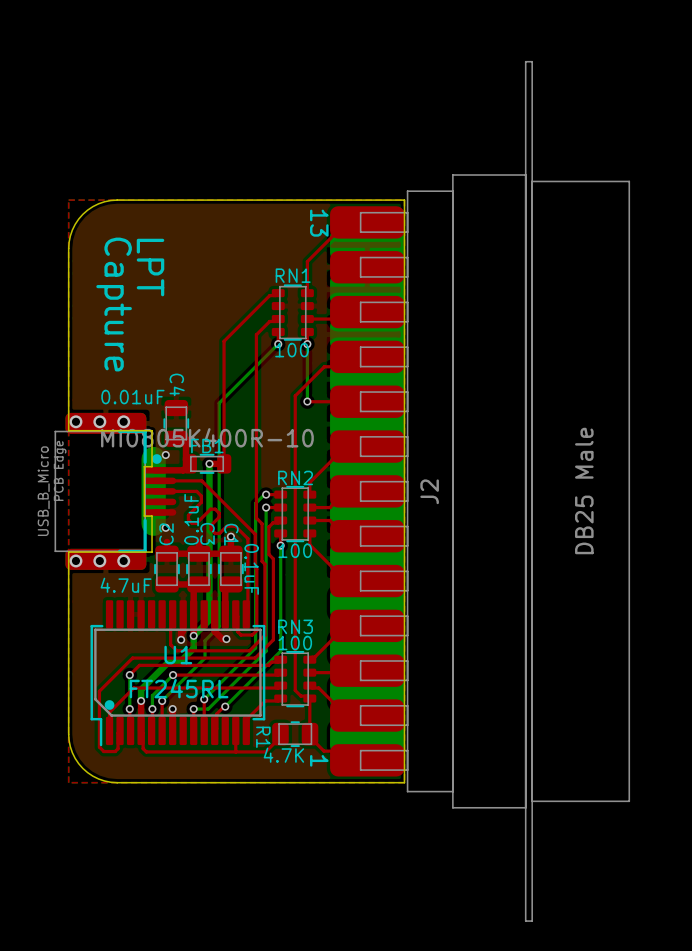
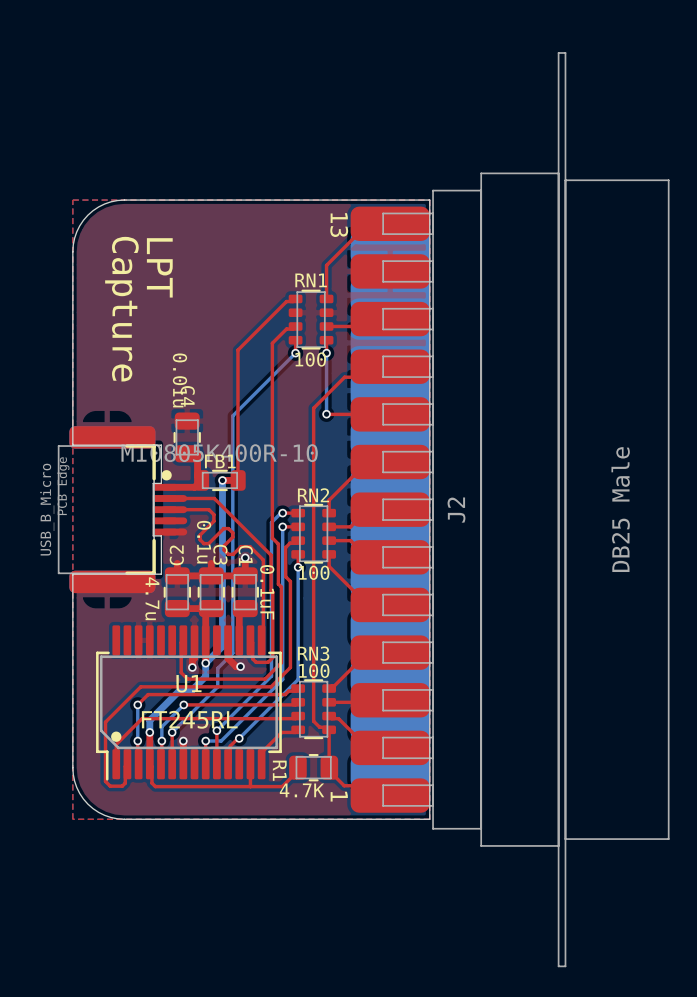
C4 value: 0.01uF (132, 397) -> 0.01u (179, 380)
via: (75, 421) -> none
via: (99, 421) -> none
via: (123, 421) -> none
via: (165, 454) -> none
bottom track: (153, 459) (153, 523) -> none
C3 value: 0.1uF (191, 519) -> 0.1u (204, 542)
via: (165, 527) -> none
via: (75, 560) -> none
via: (99, 560) -> none
via: (123, 560) -> none
C2 value: 4.7uF (126, 585) -> 4.7u (152, 598)

